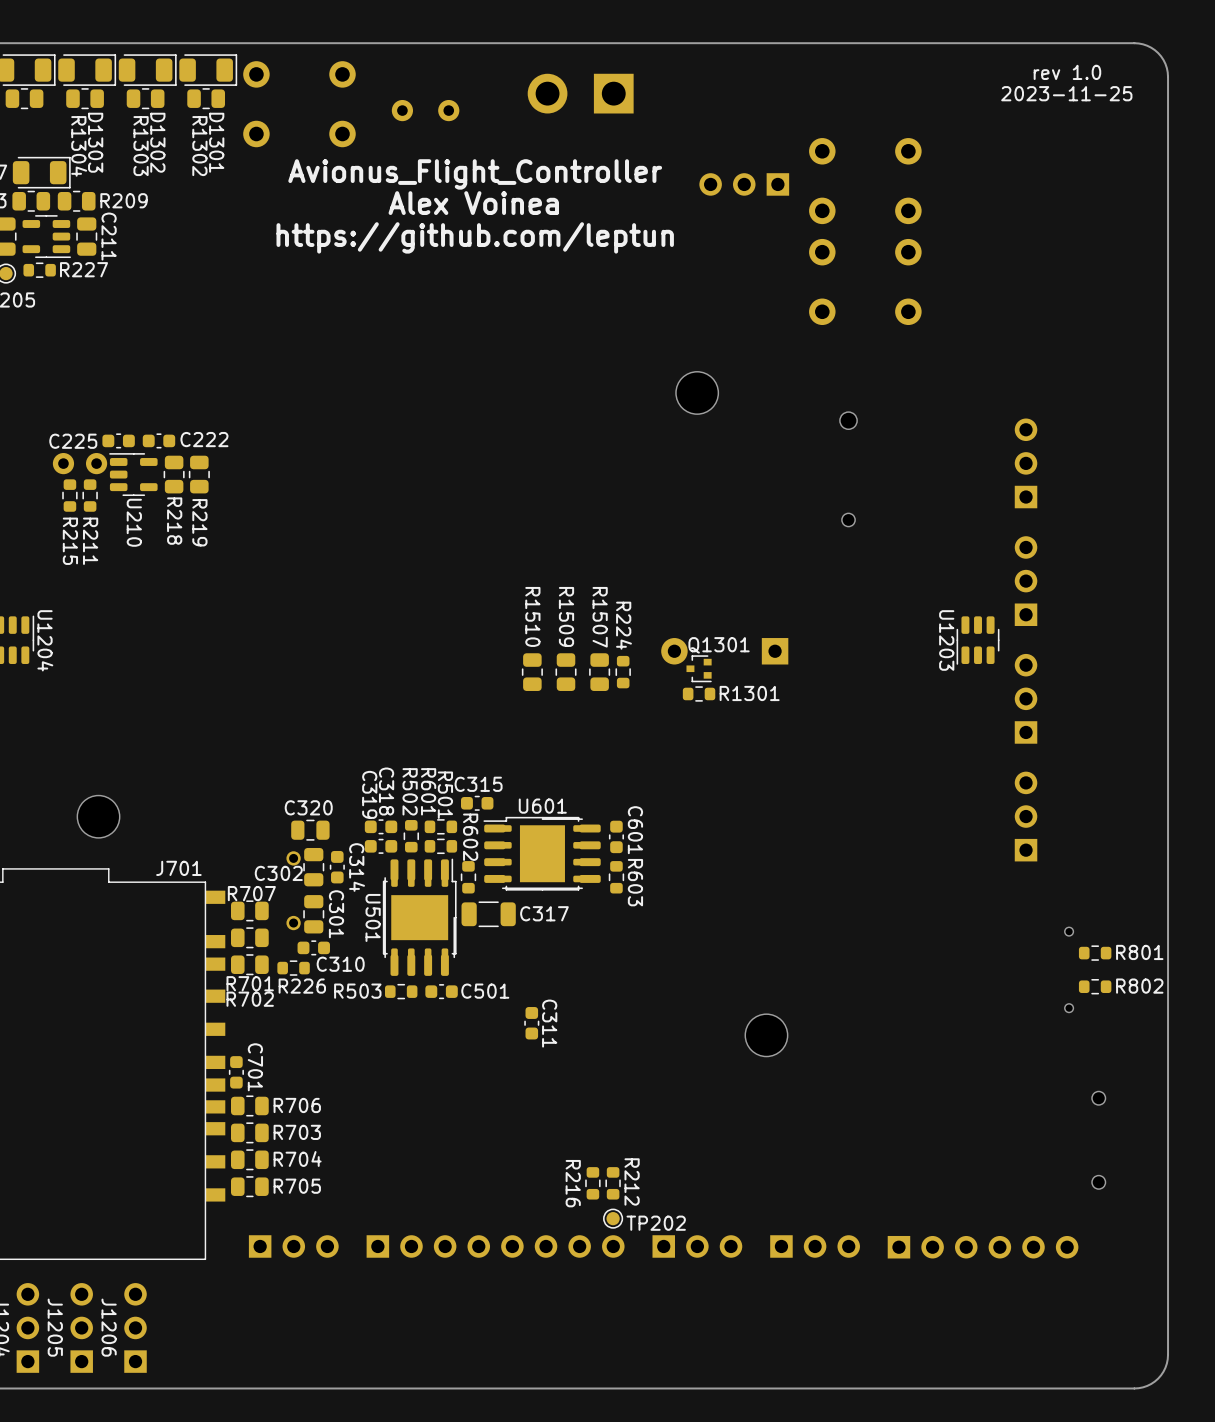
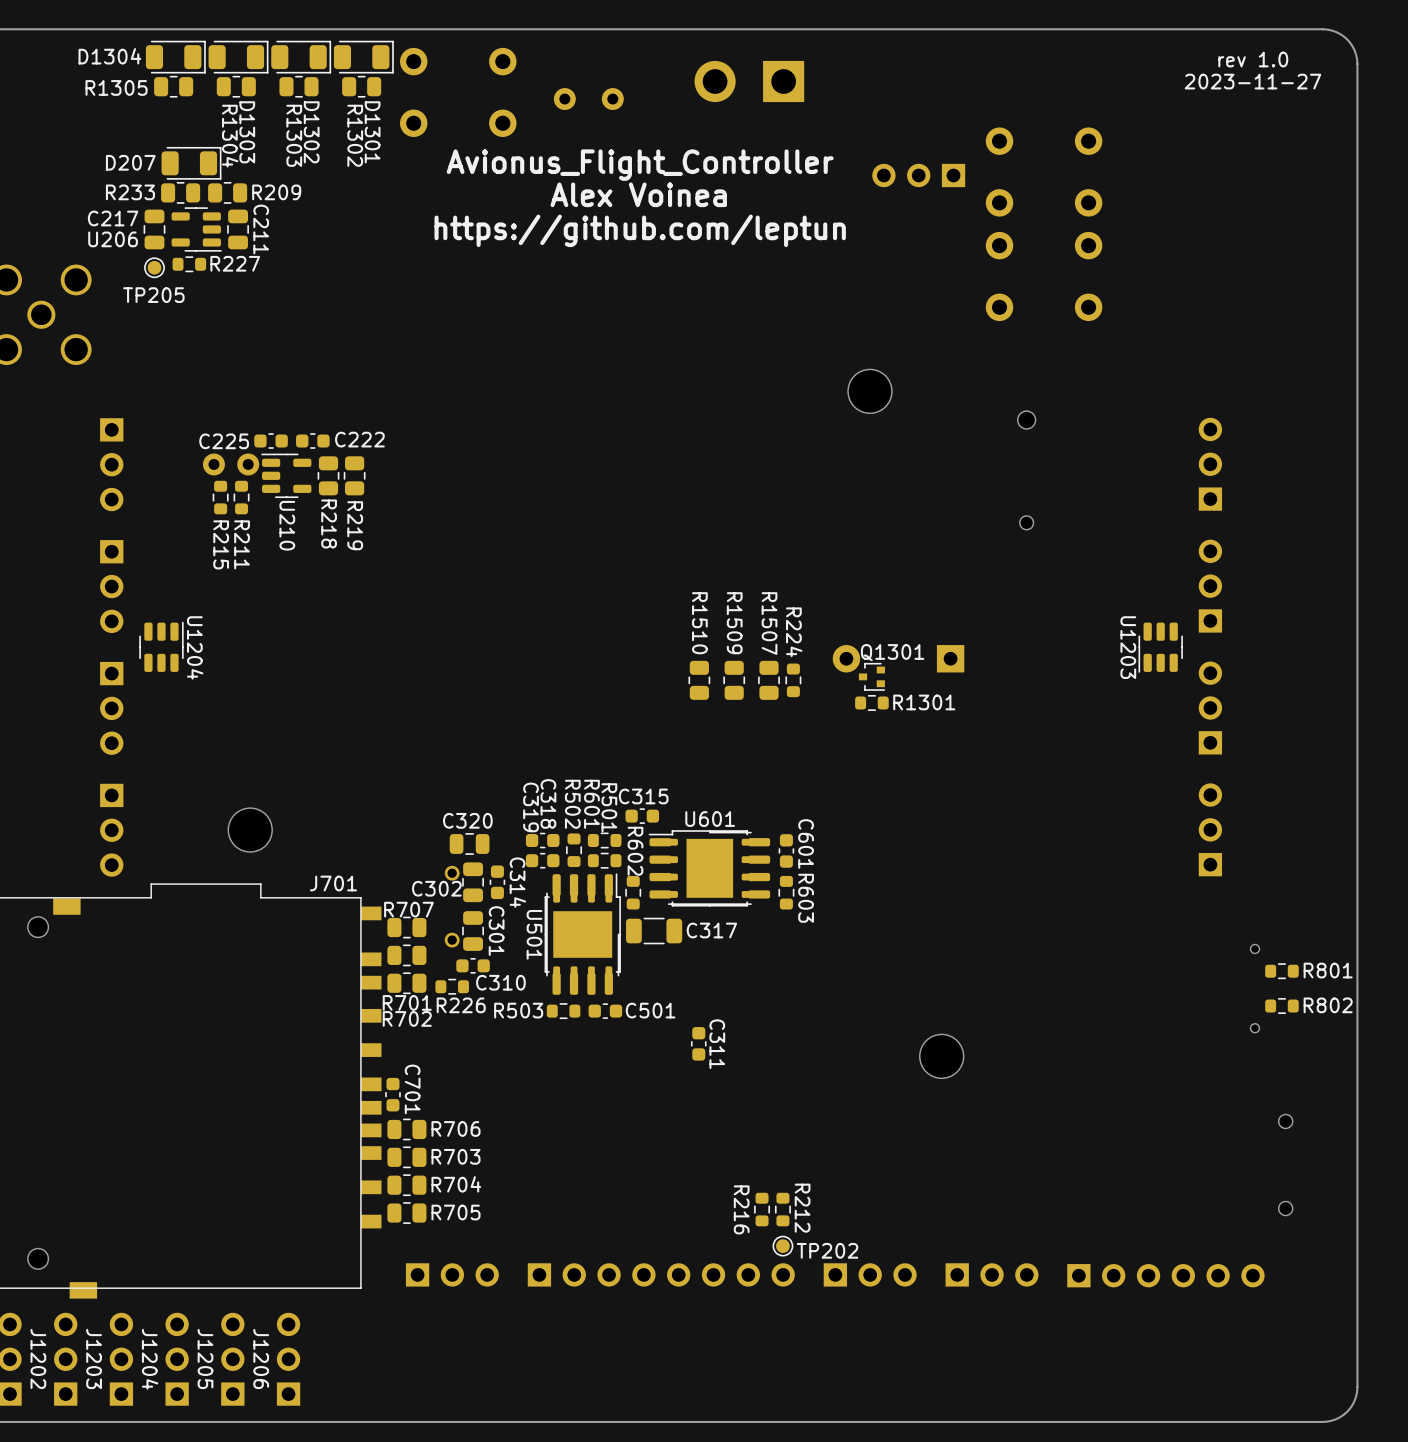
text: 2023-11-25 (1066, 93) -> 2023-11-27 (1252, 81)

